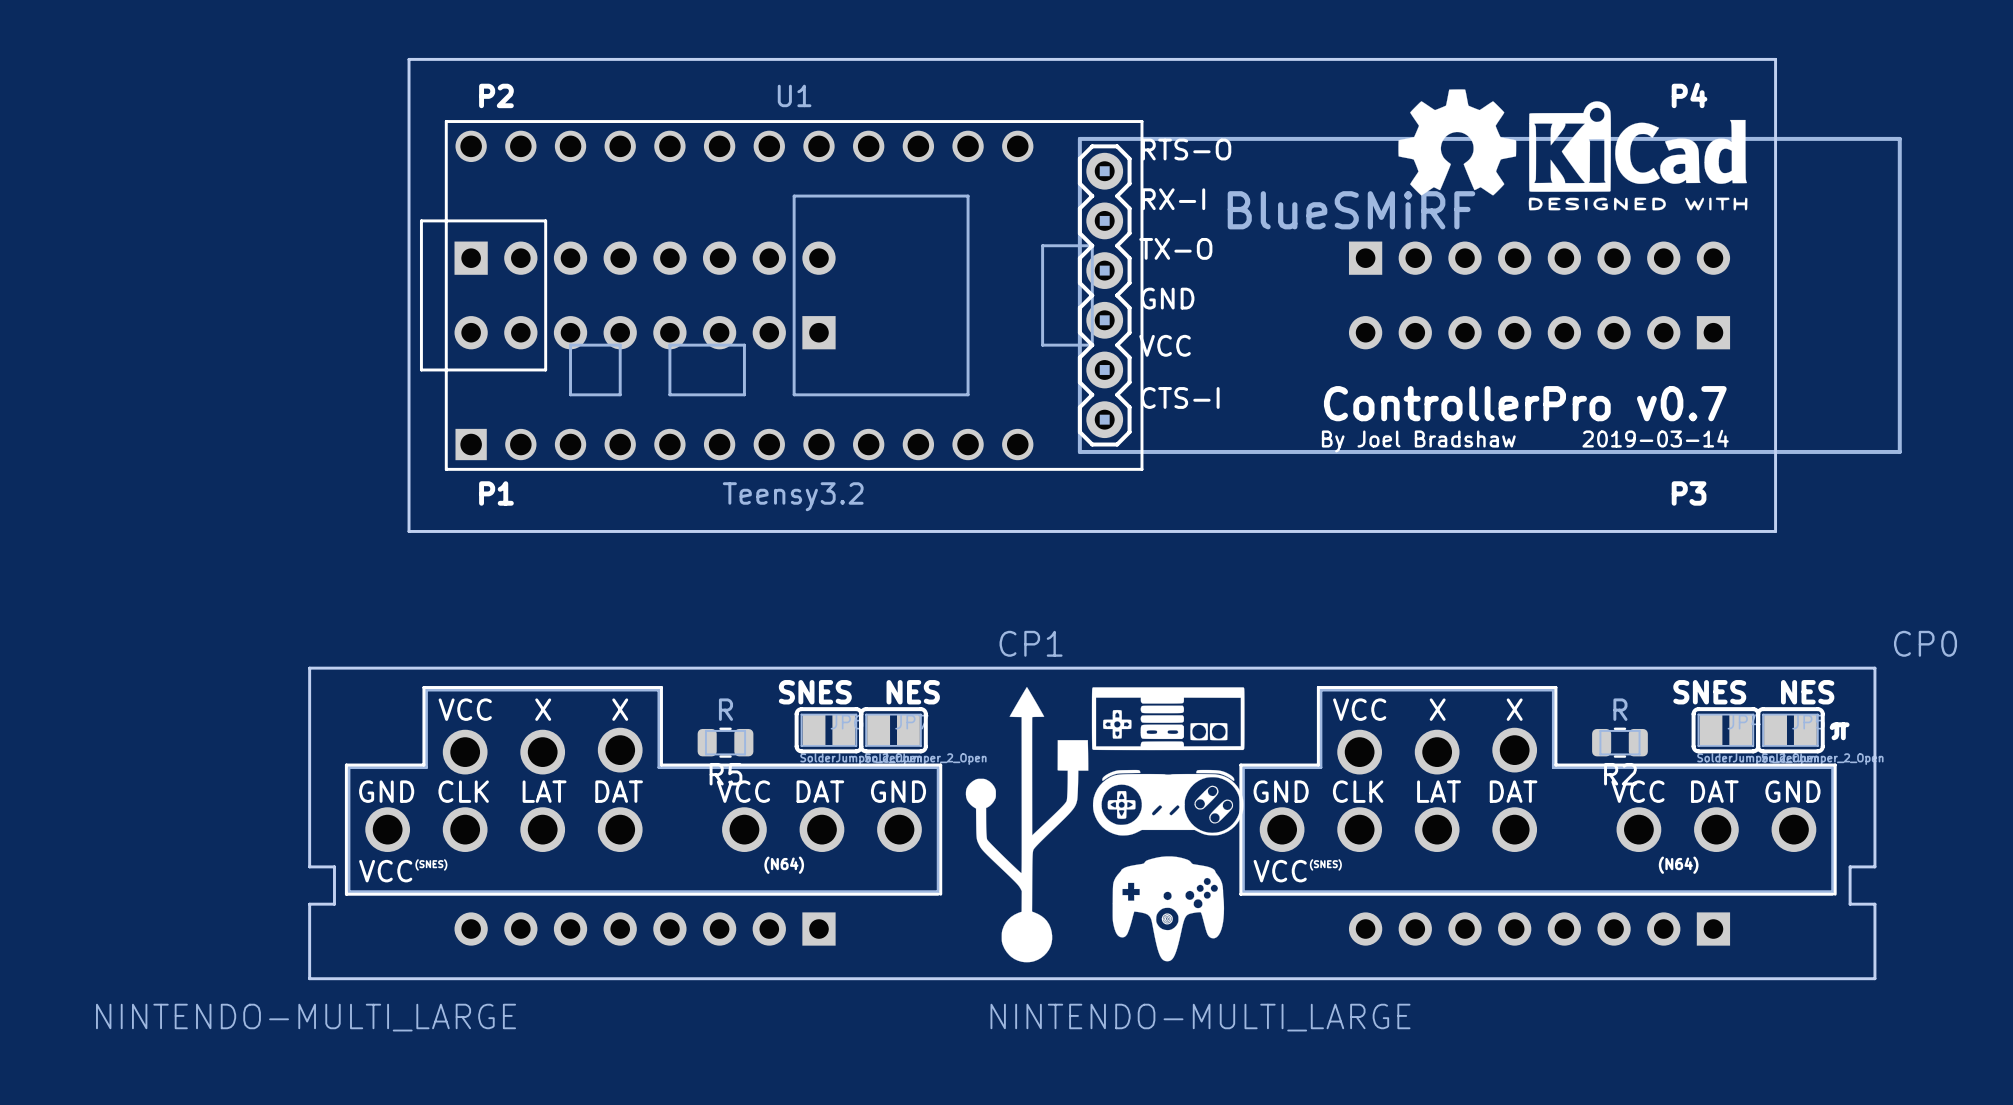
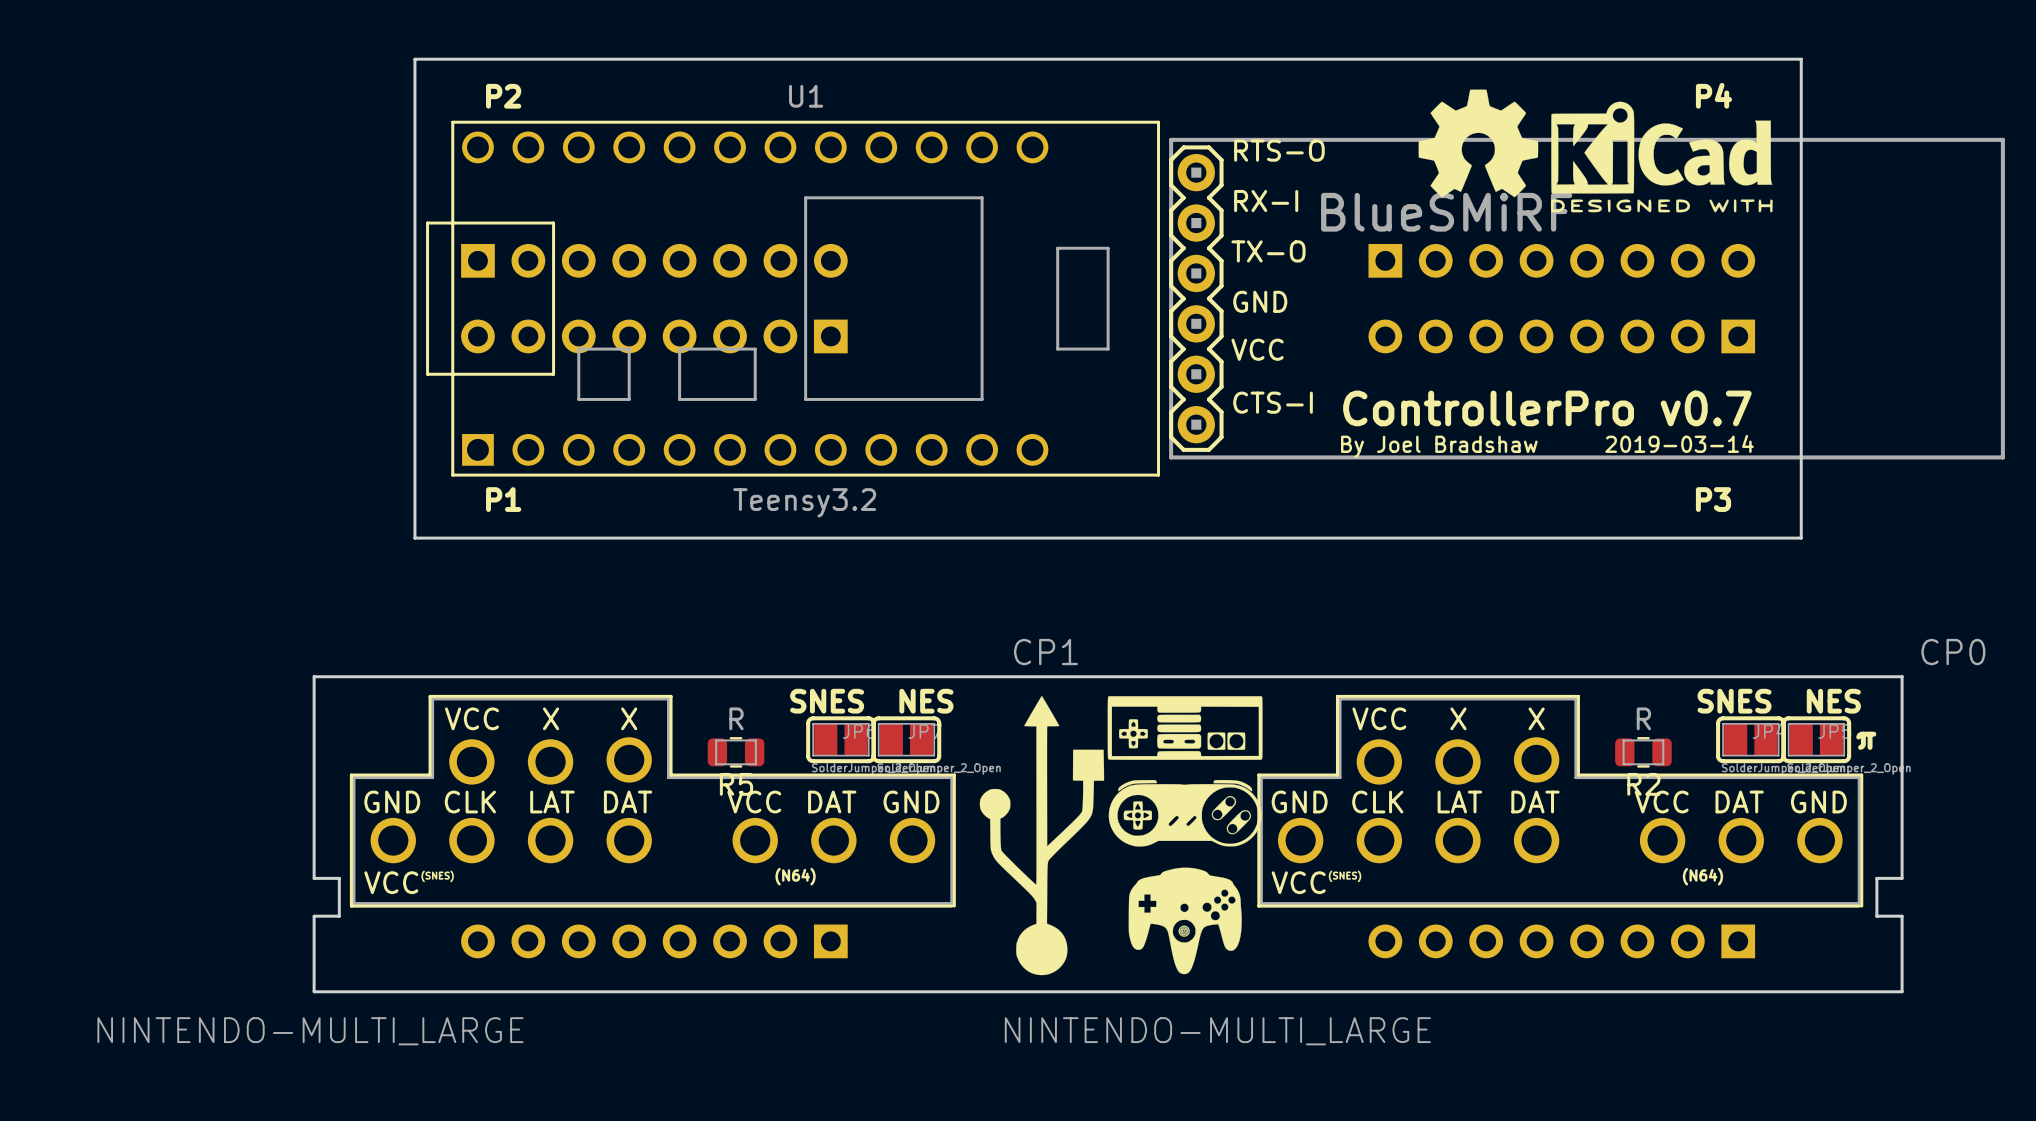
part position: (1489, 295) -> (1587, 298)

